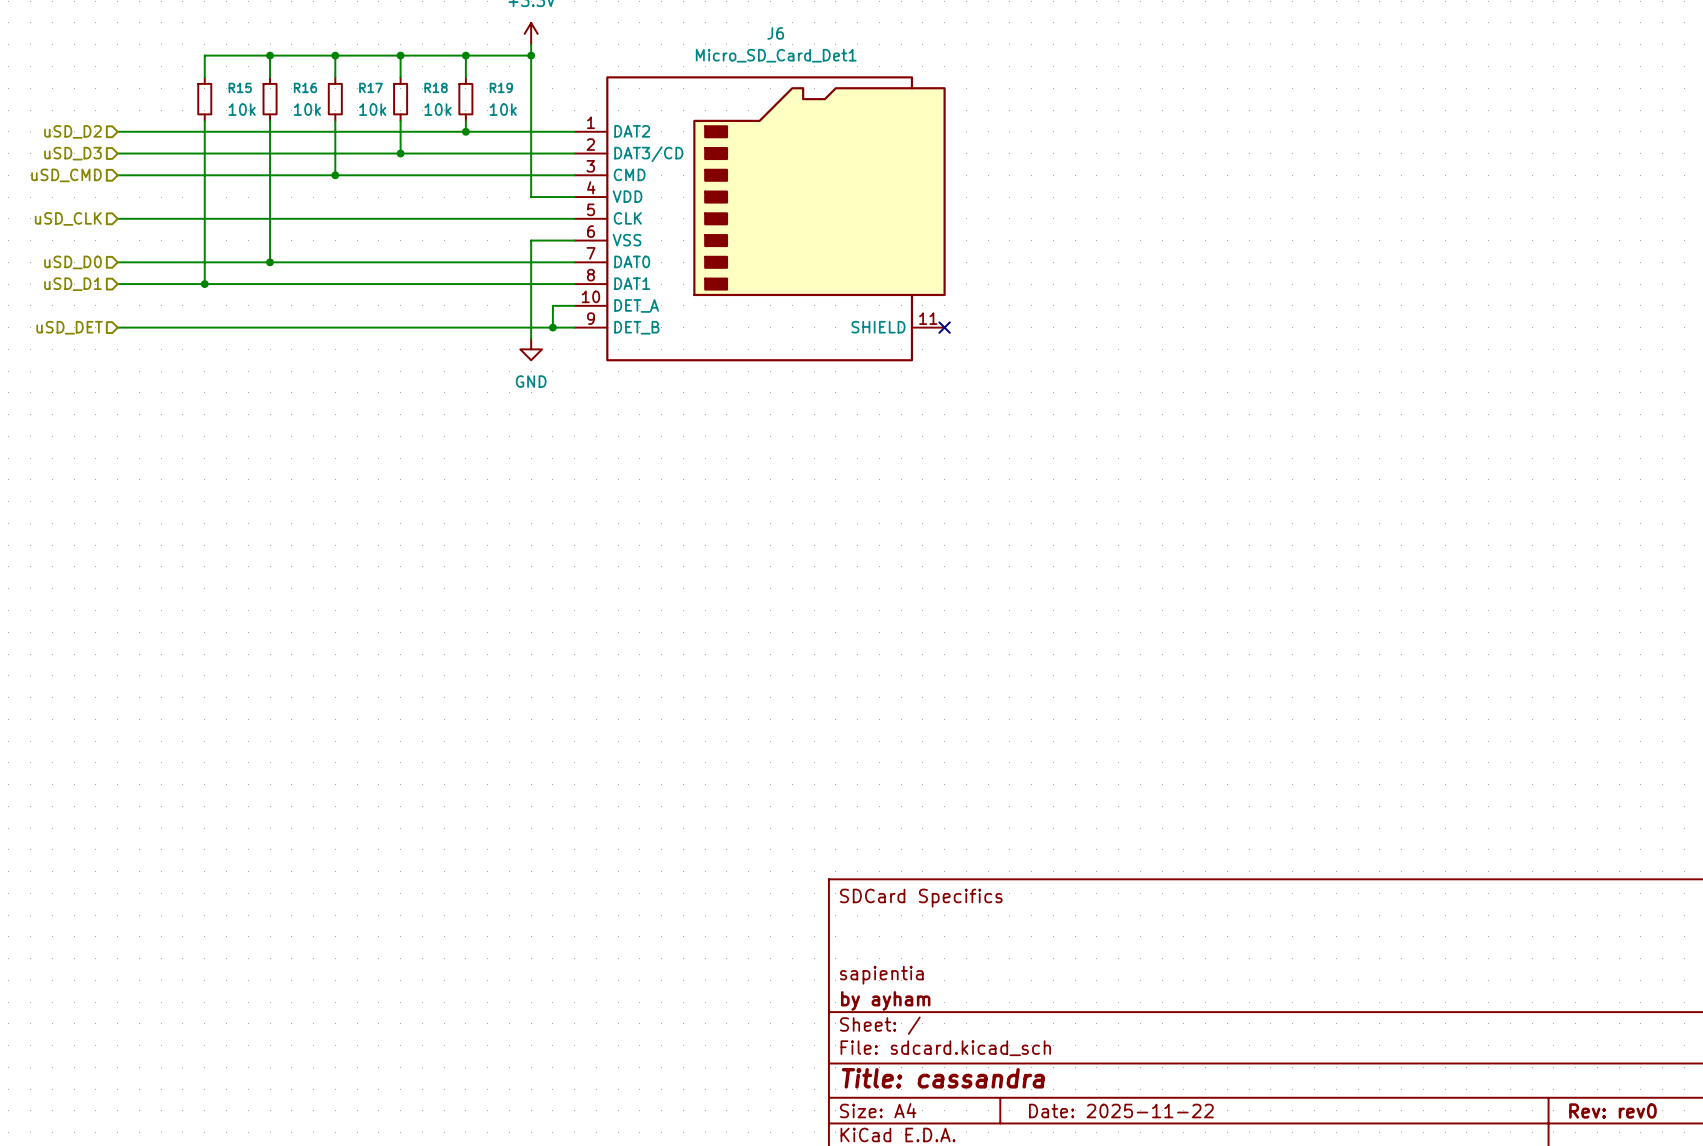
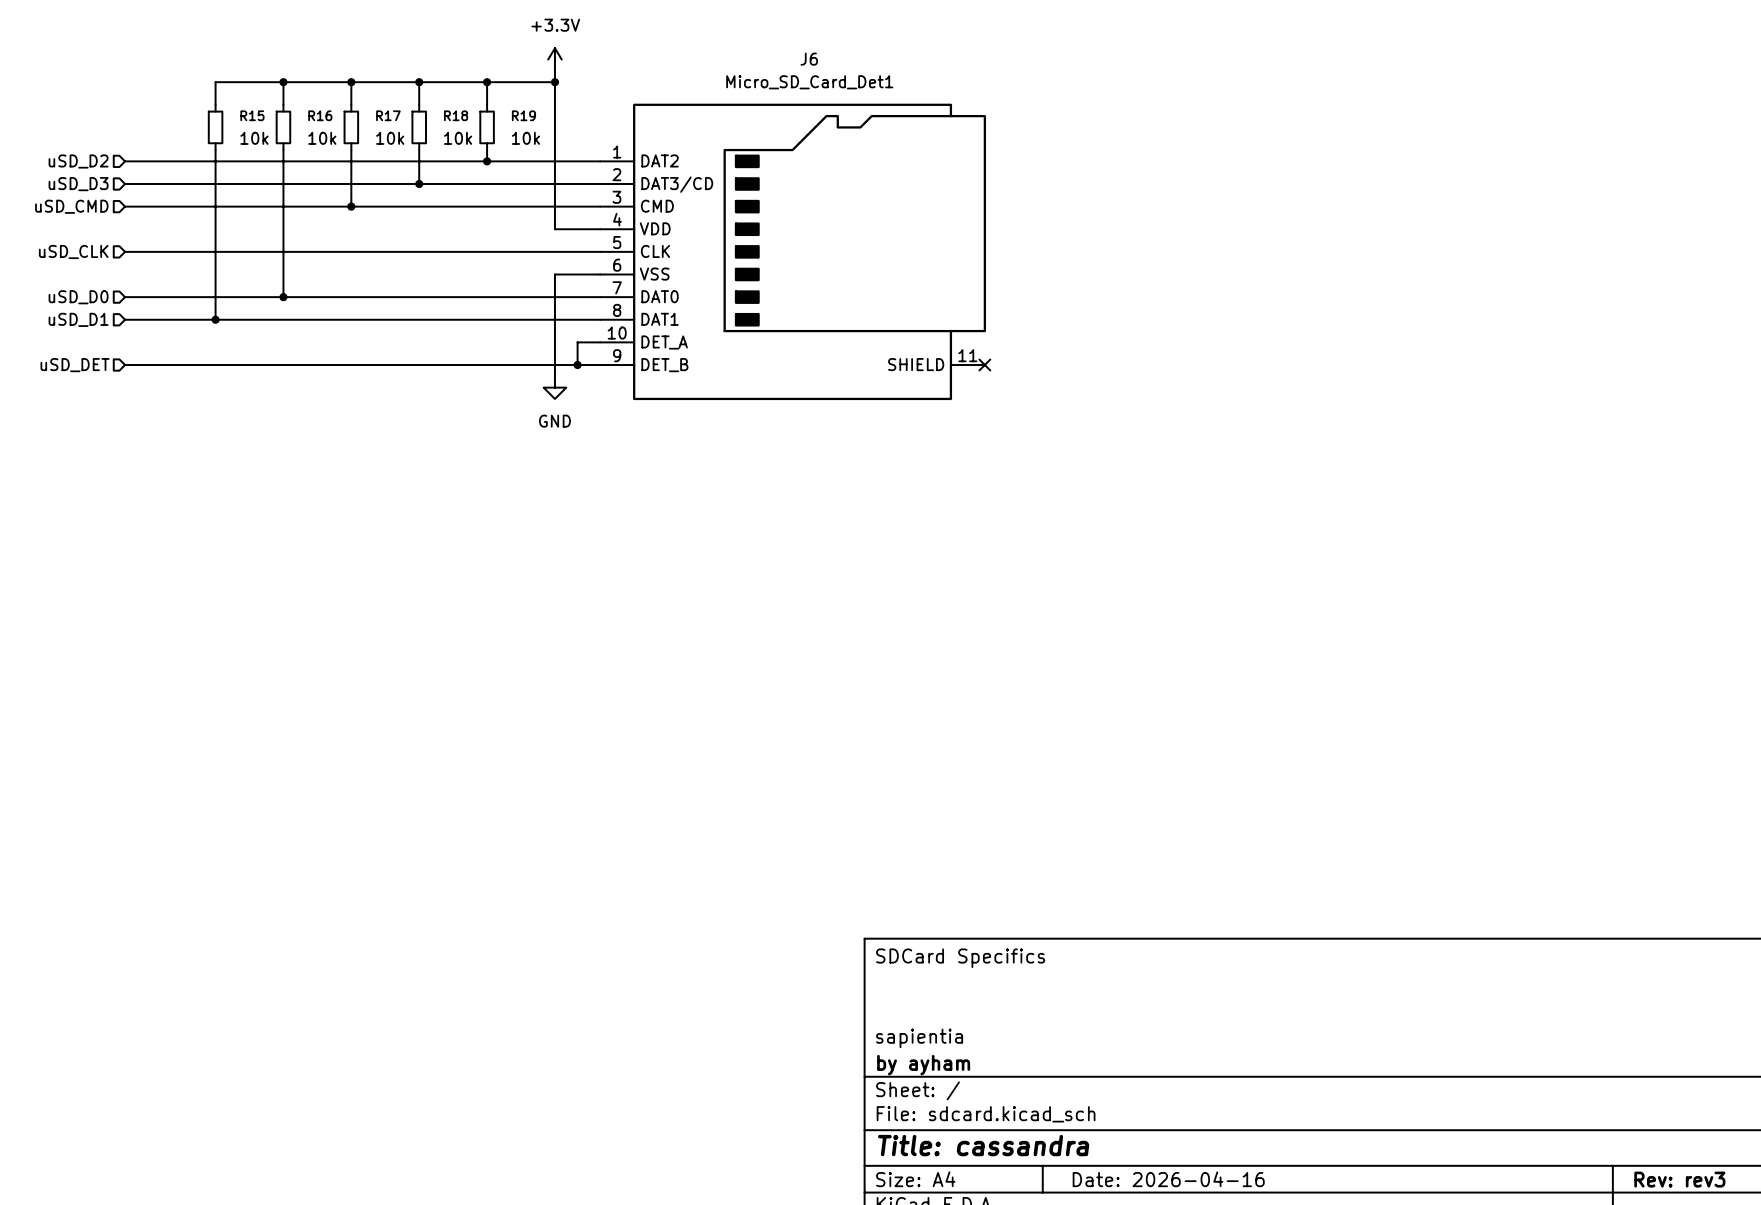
title block: Date: 2025-11-22 (1121, 1110) -> Date: 2026-04-16 (1168, 1179)
title block: Rev: rev0 (1612, 1110) -> Rev: rev3 (1679, 1179)

